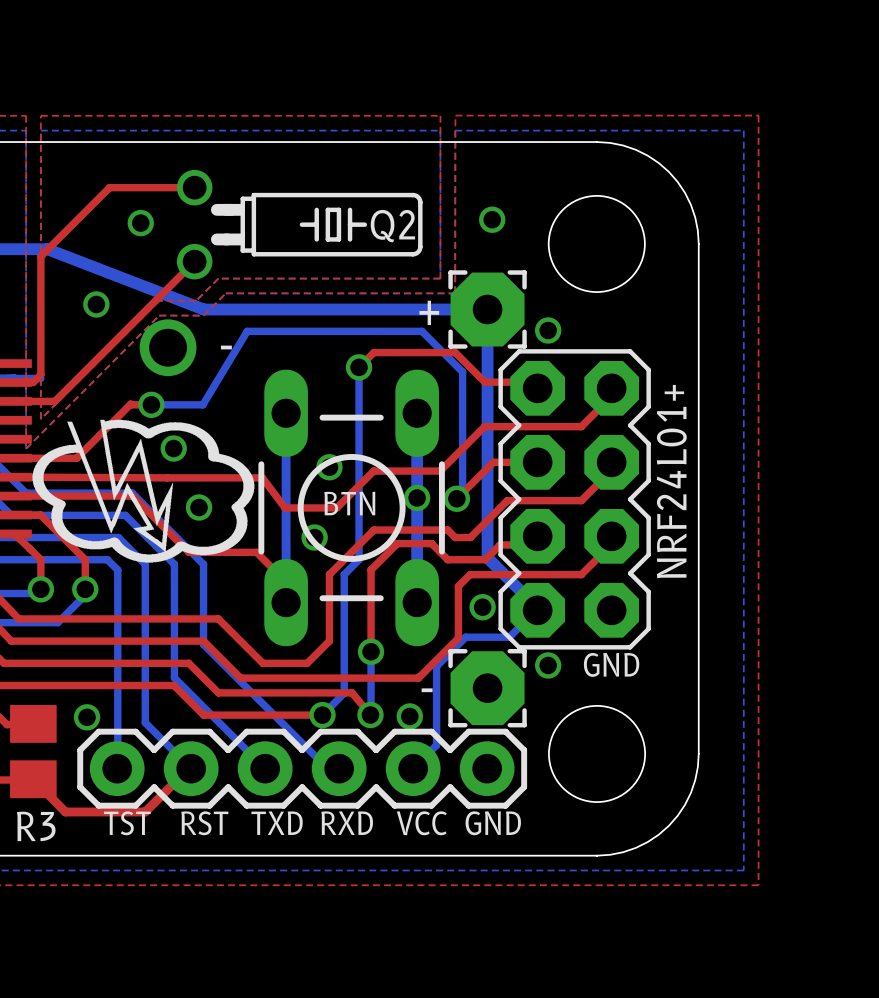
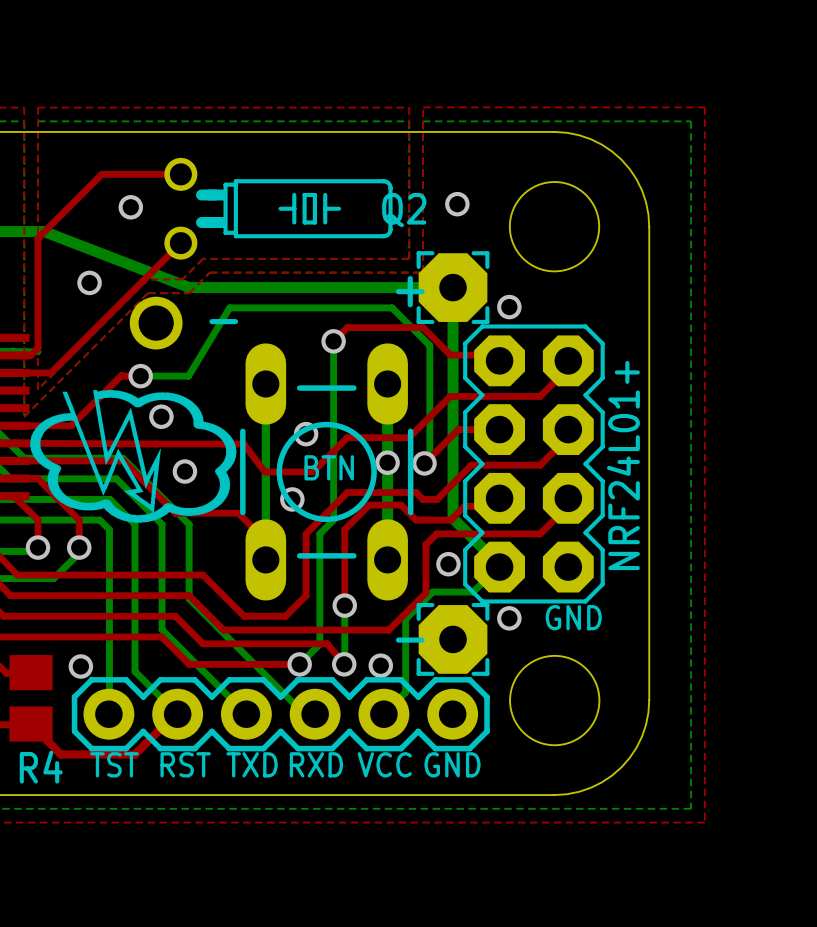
Q2 name position: Q2 (392, 226) -> Q2 (404, 210)
R3 name: R3 (36, 826) -> R4 (41, 767)

